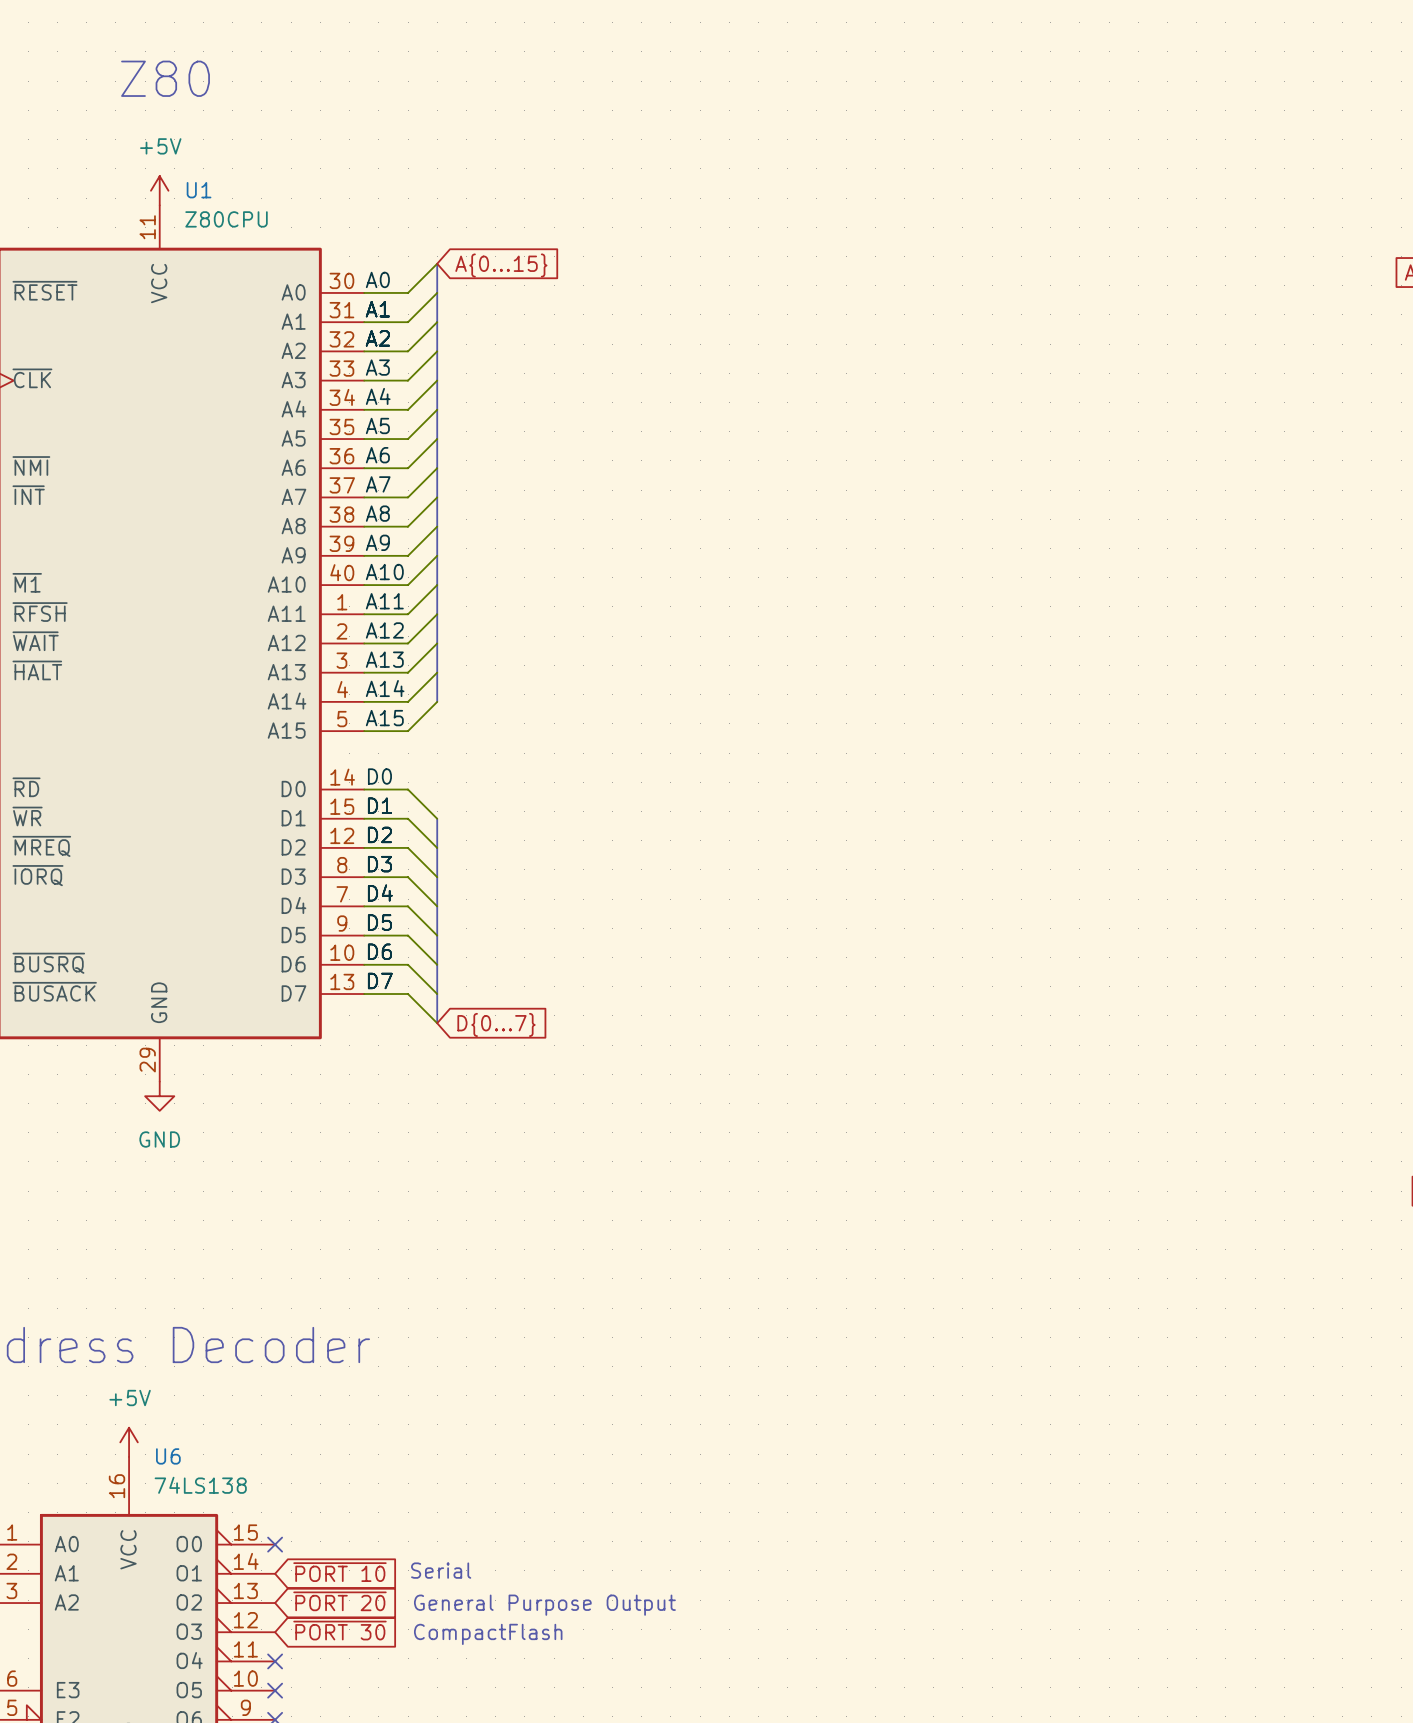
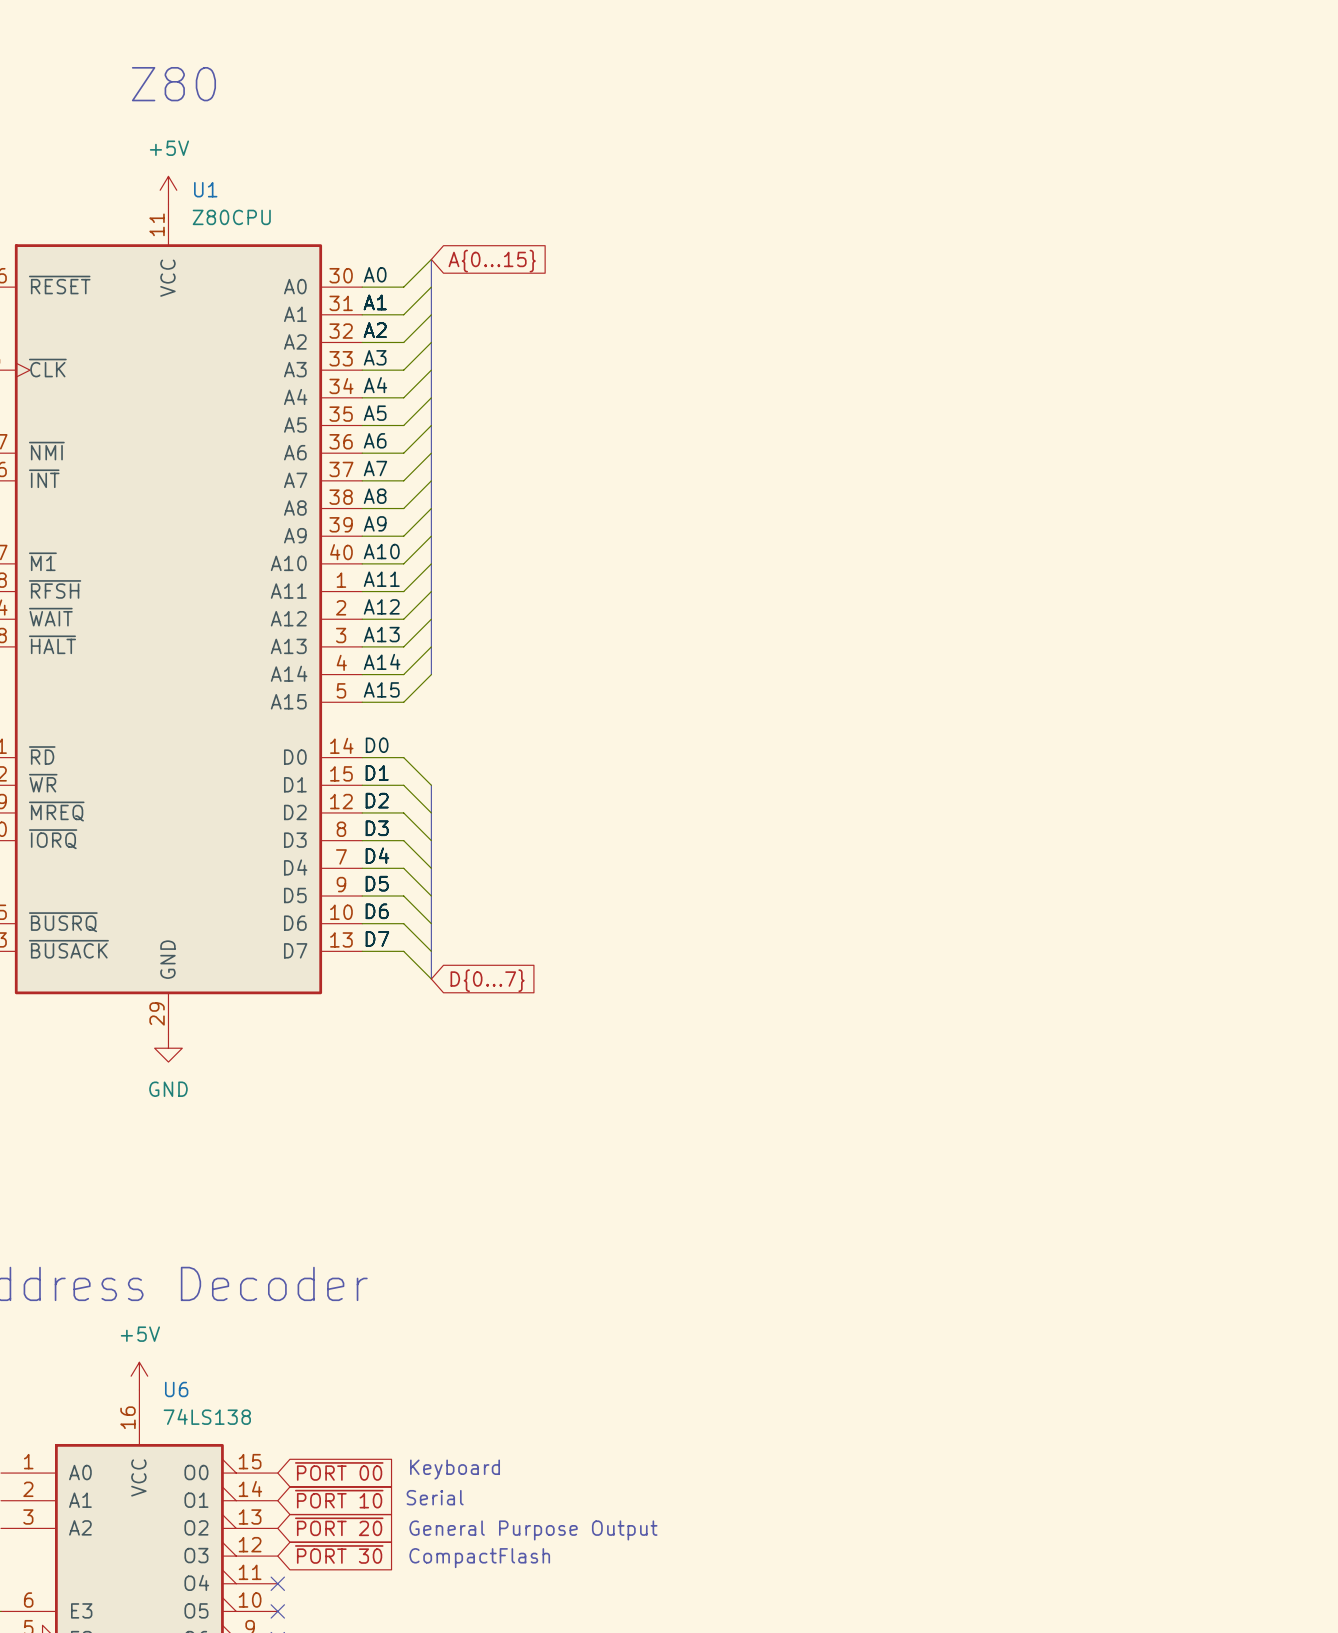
text: none -> Keyboard (455, 1469)
global label: none -> ~{PORT 00} (339, 1471)
no-connect mark: (275, 1544) -> none

